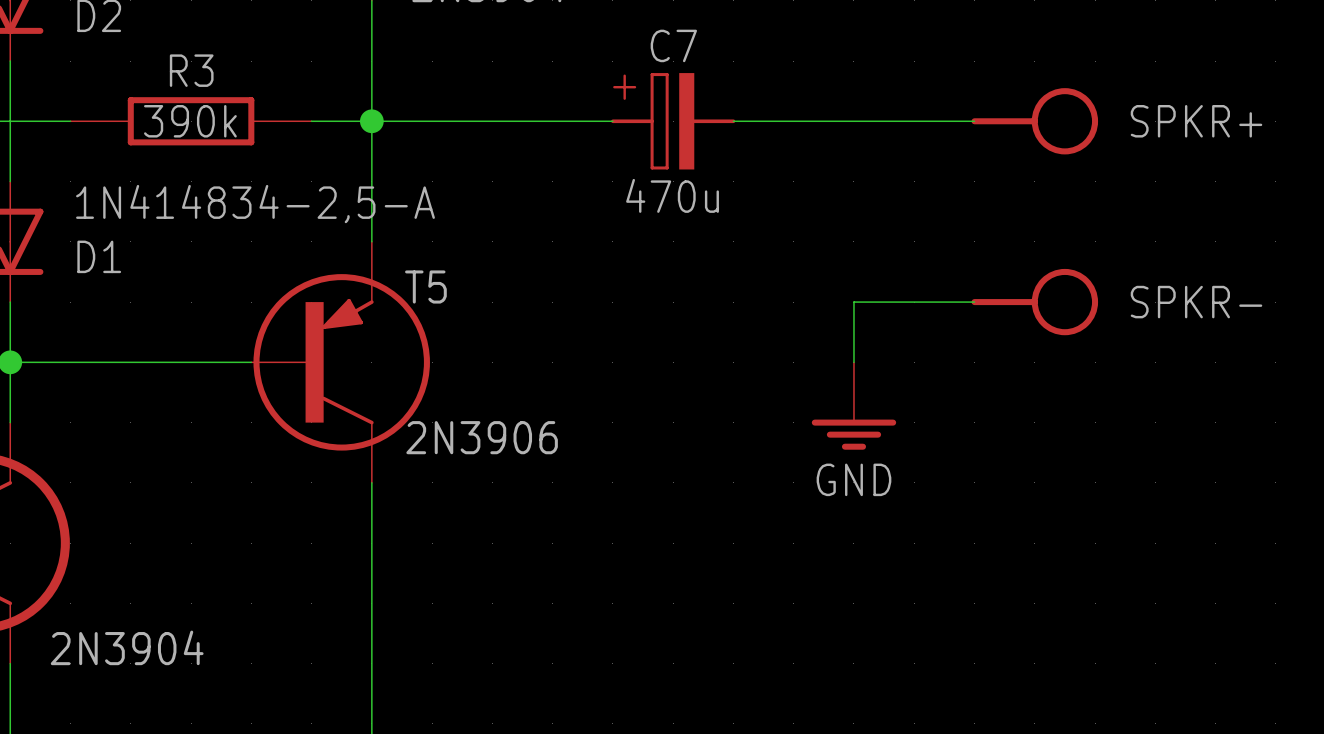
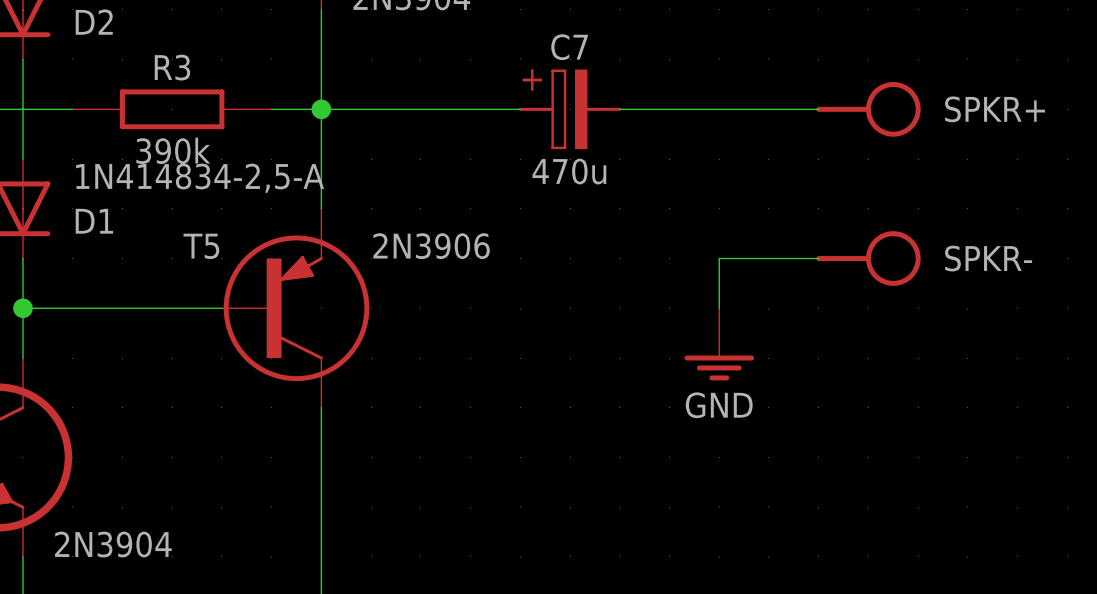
R3 value position: 390k (190, 121) -> 390k (173, 150)
T5 name position: T5 (425, 287) -> T5 (201, 246)
T5 value position: 2N3906 (482, 437) -> 2N3906 (431, 246)

